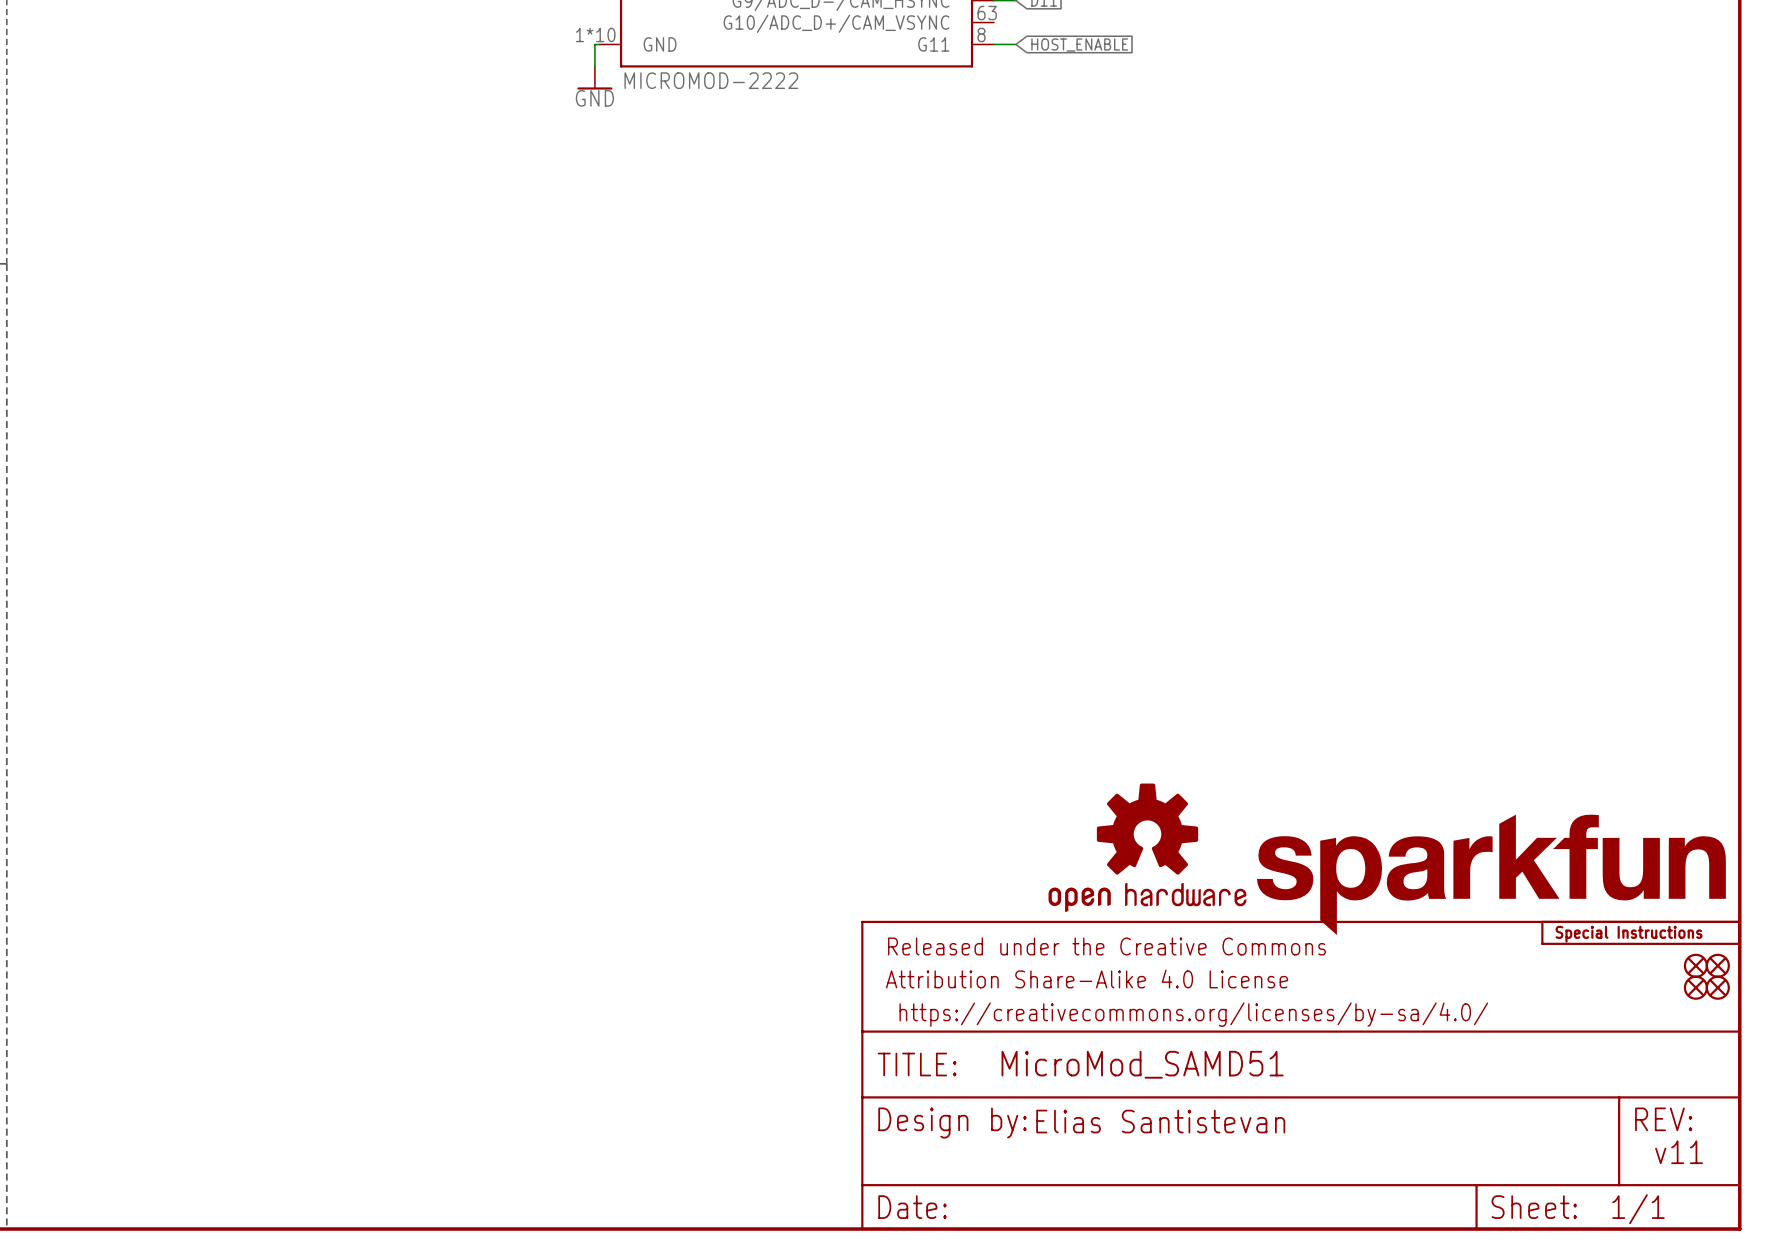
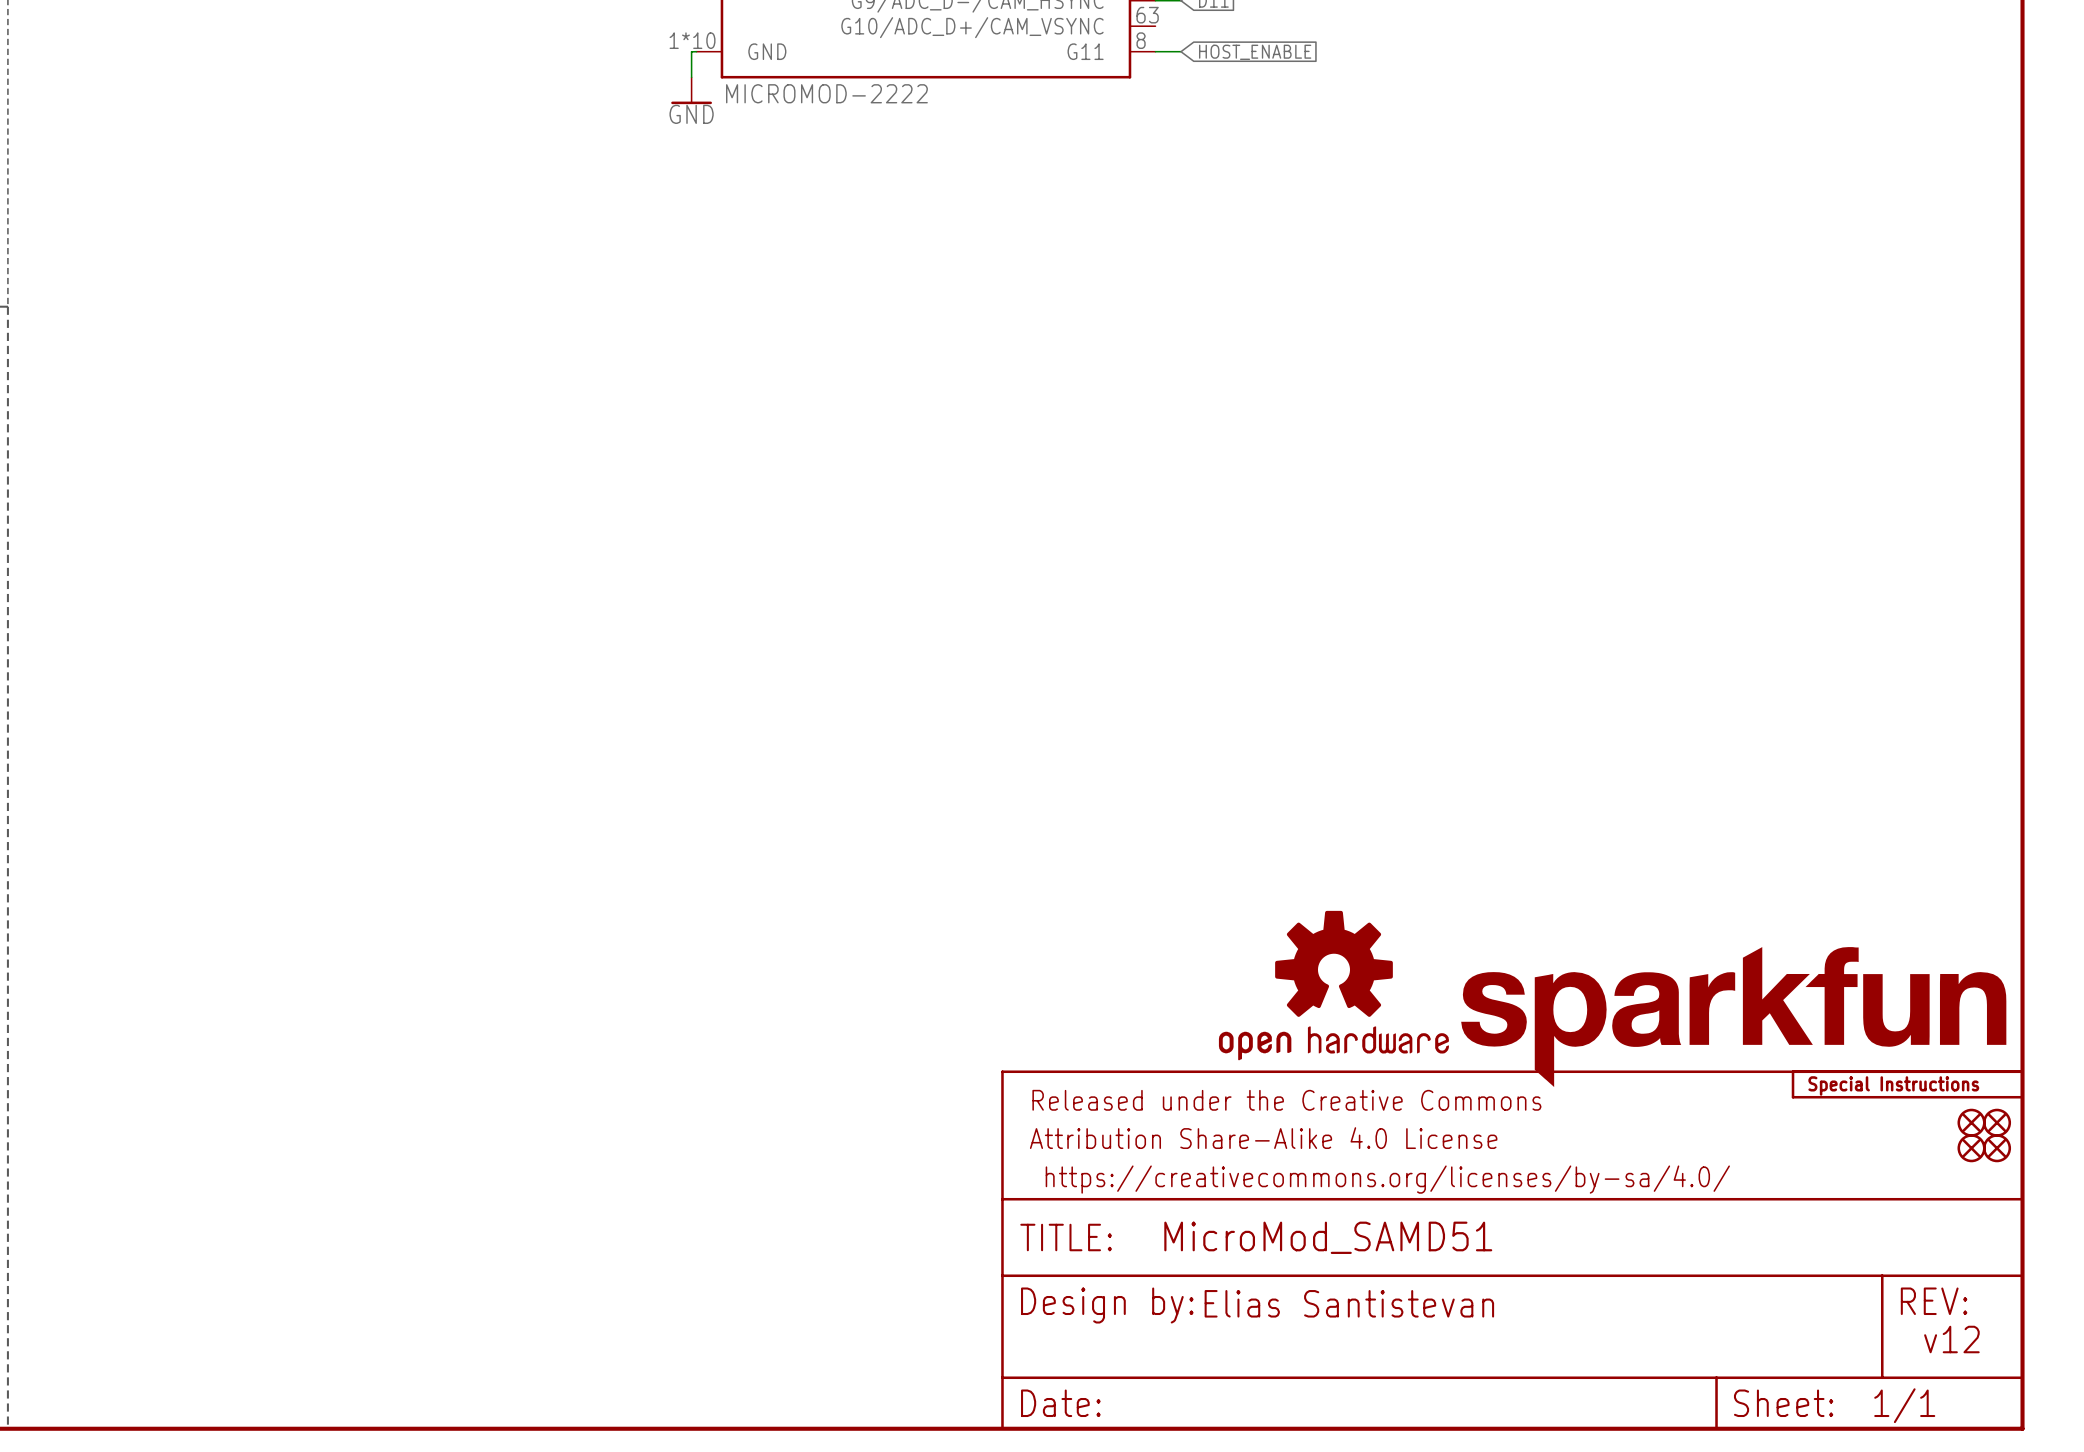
text: v11 (1679, 1152) -> v12 (1951, 1339)

